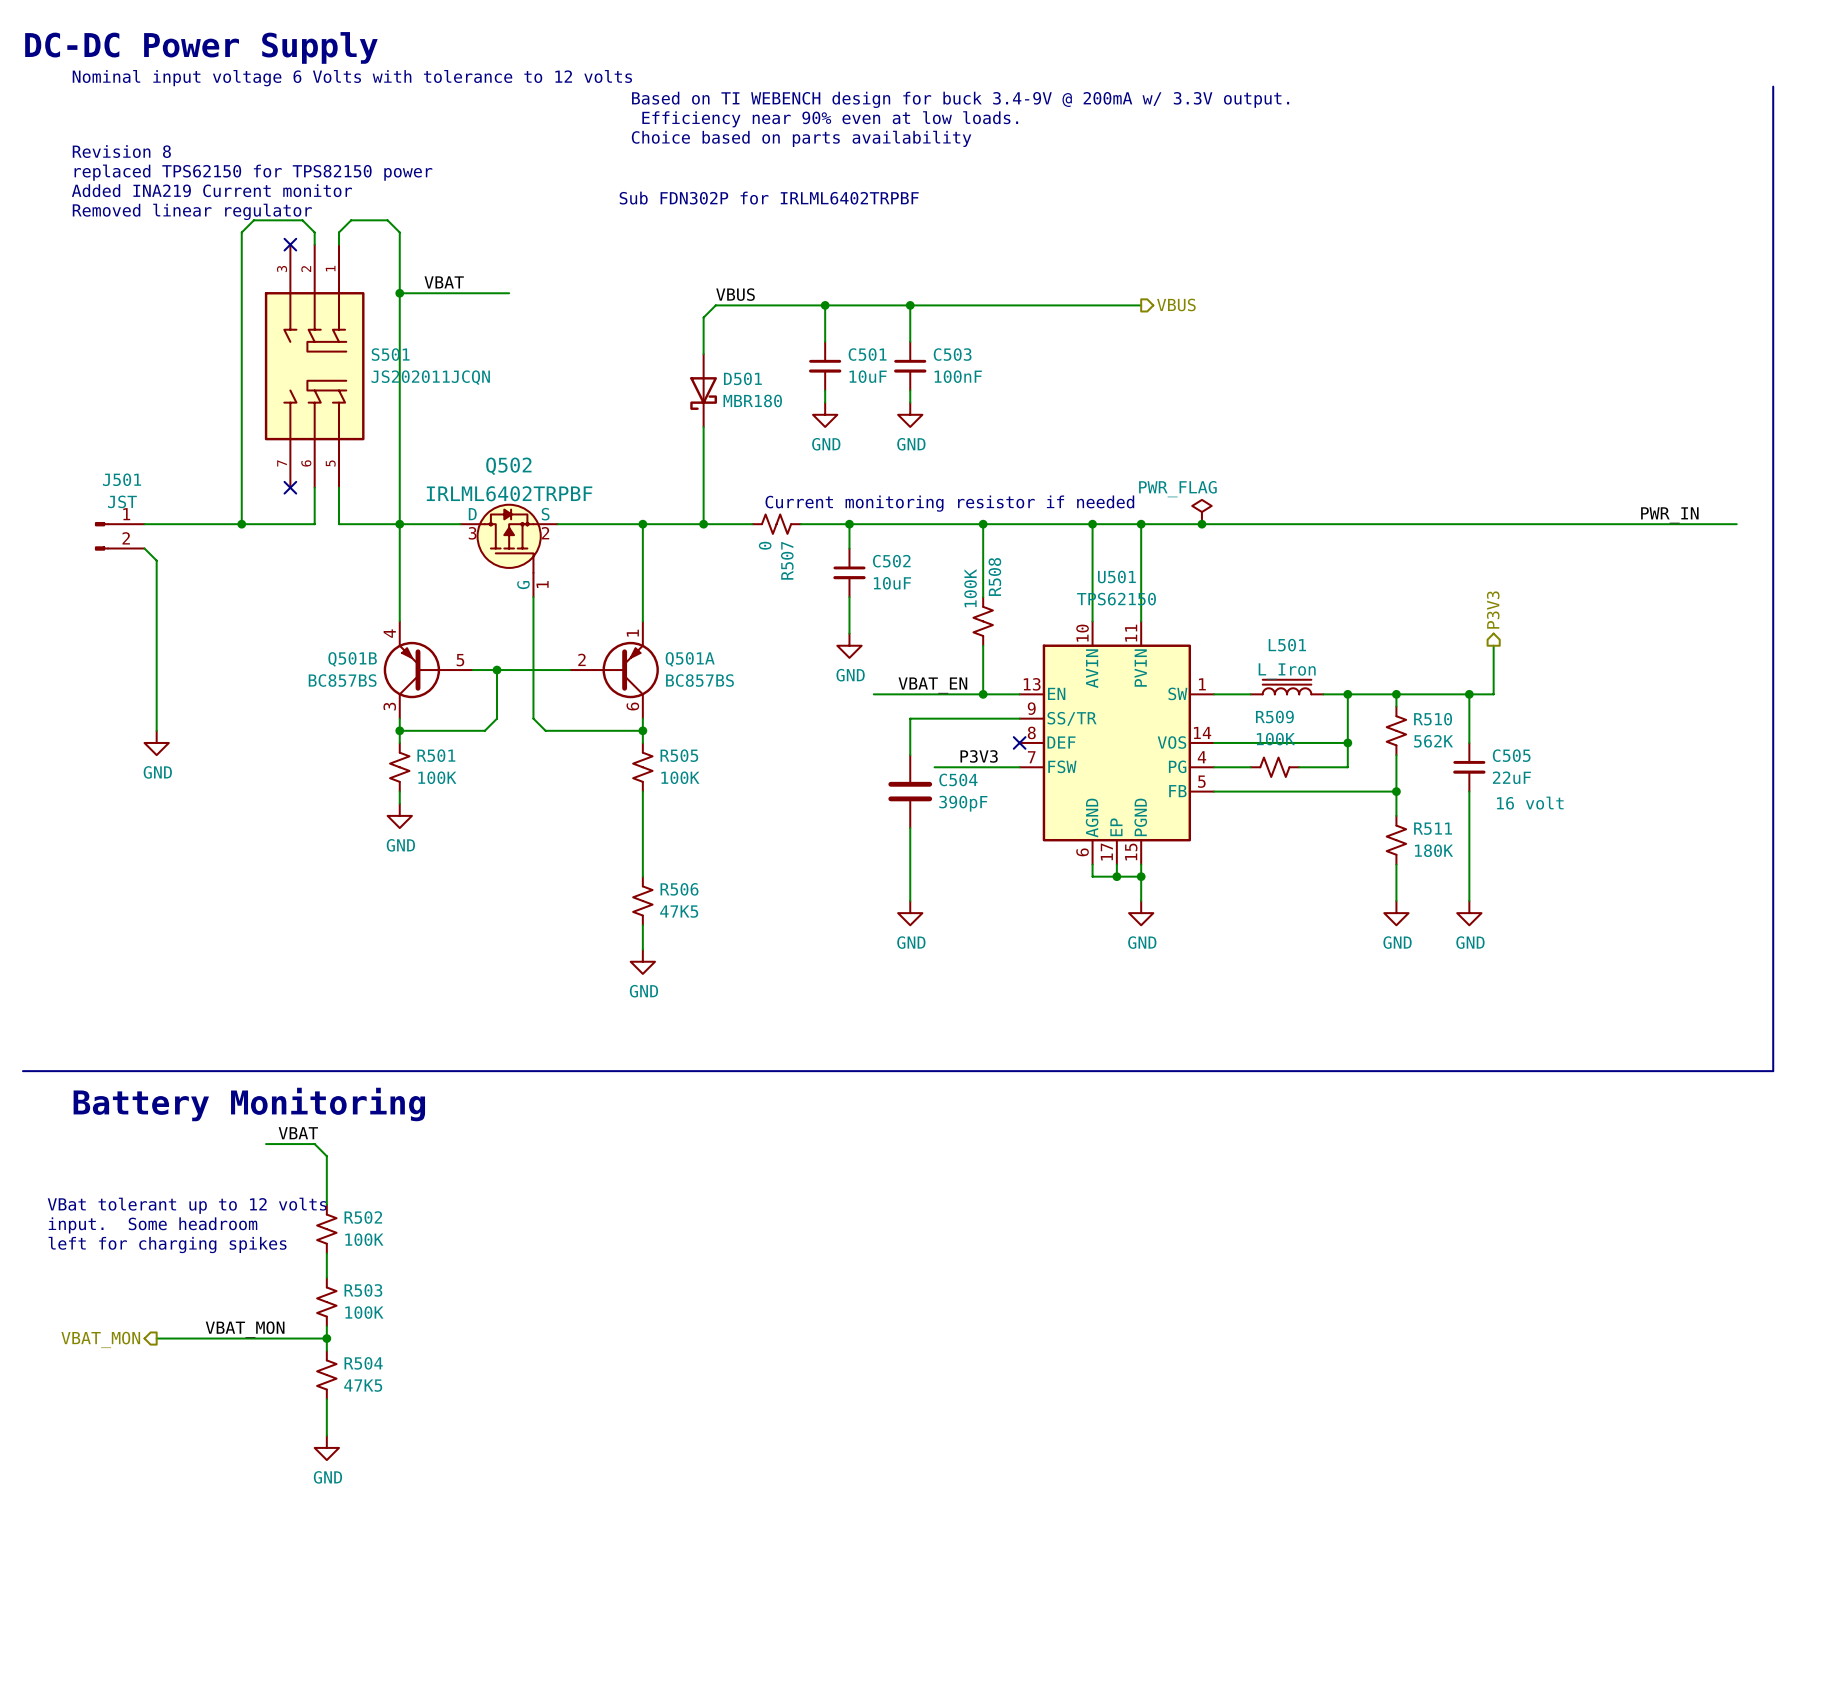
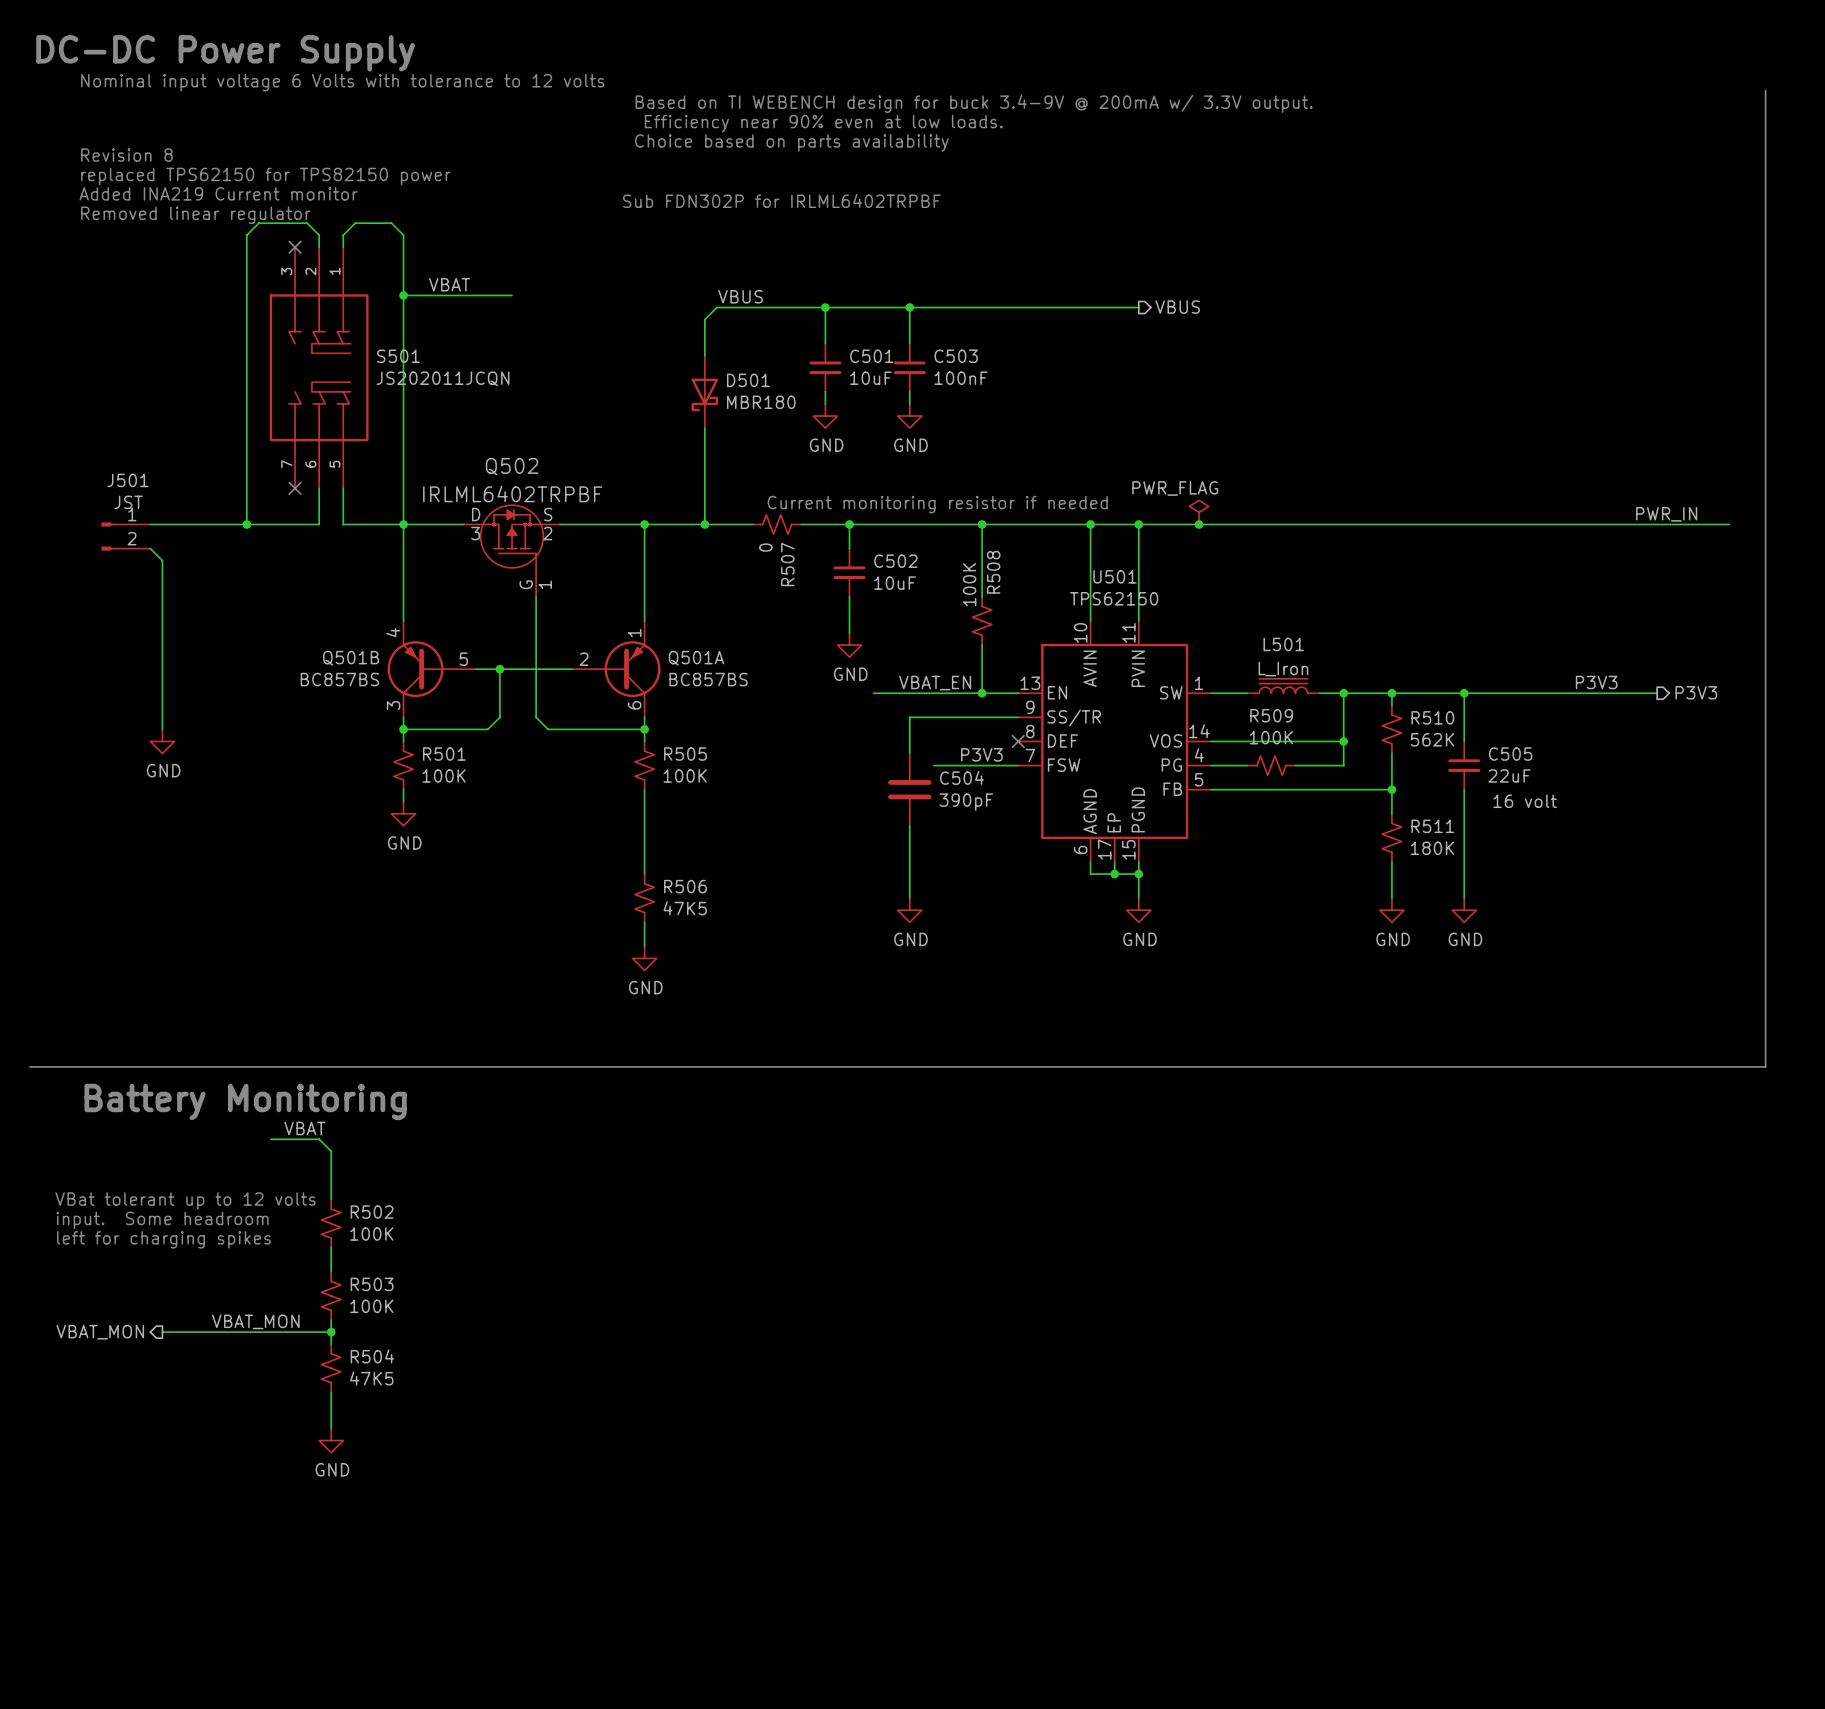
hierarchical label rotation: 0° (1493, 610) -> 90° clockwise (1696, 692)
hierarchical label position: P3V3 (1493, 610) -> P3V3 (1696, 692)
wire: (1493, 645) (1493, 694) -> (1657, 693) (1488, 693)
label: none -> P3V3 (1596, 682)

